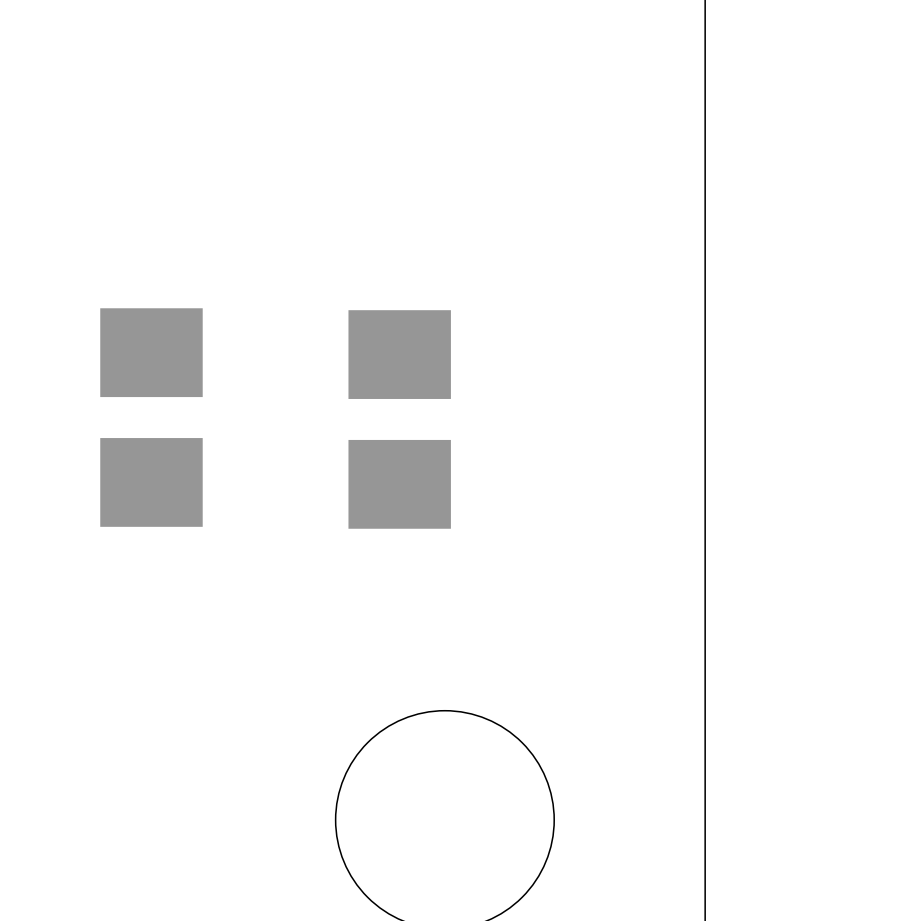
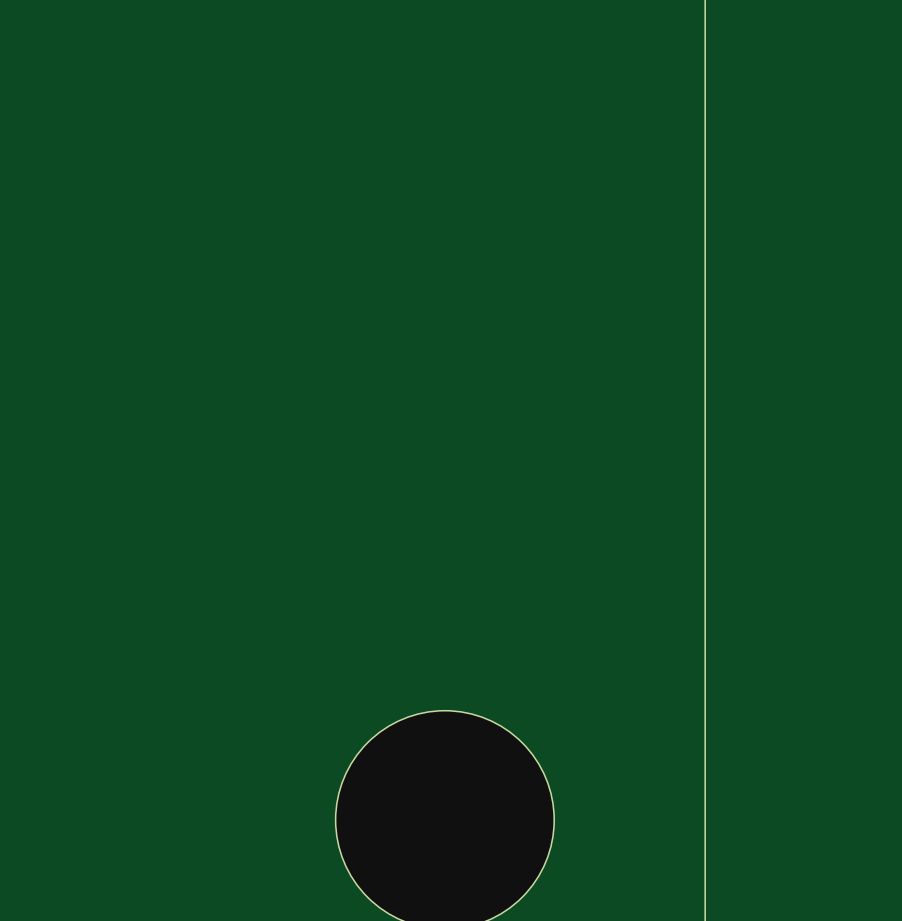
part: (151, 417) -> none
part: (399, 419) -> none

